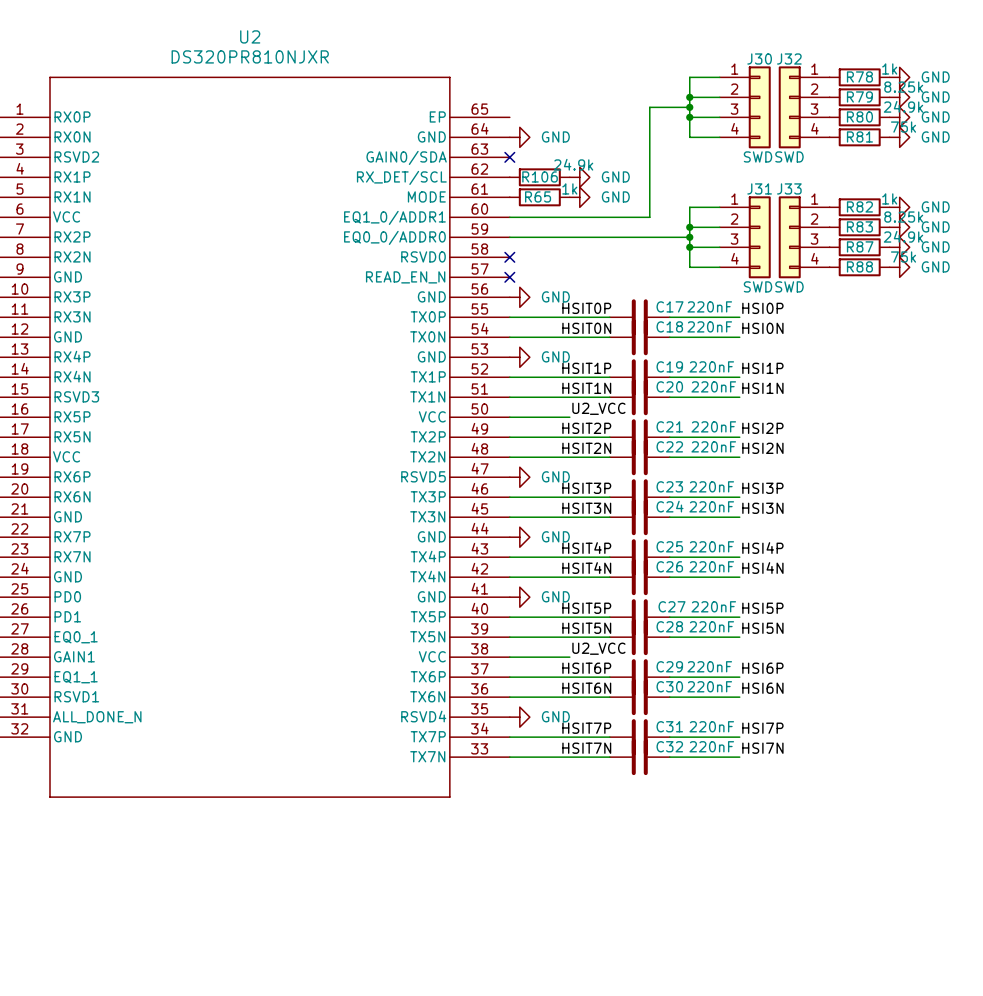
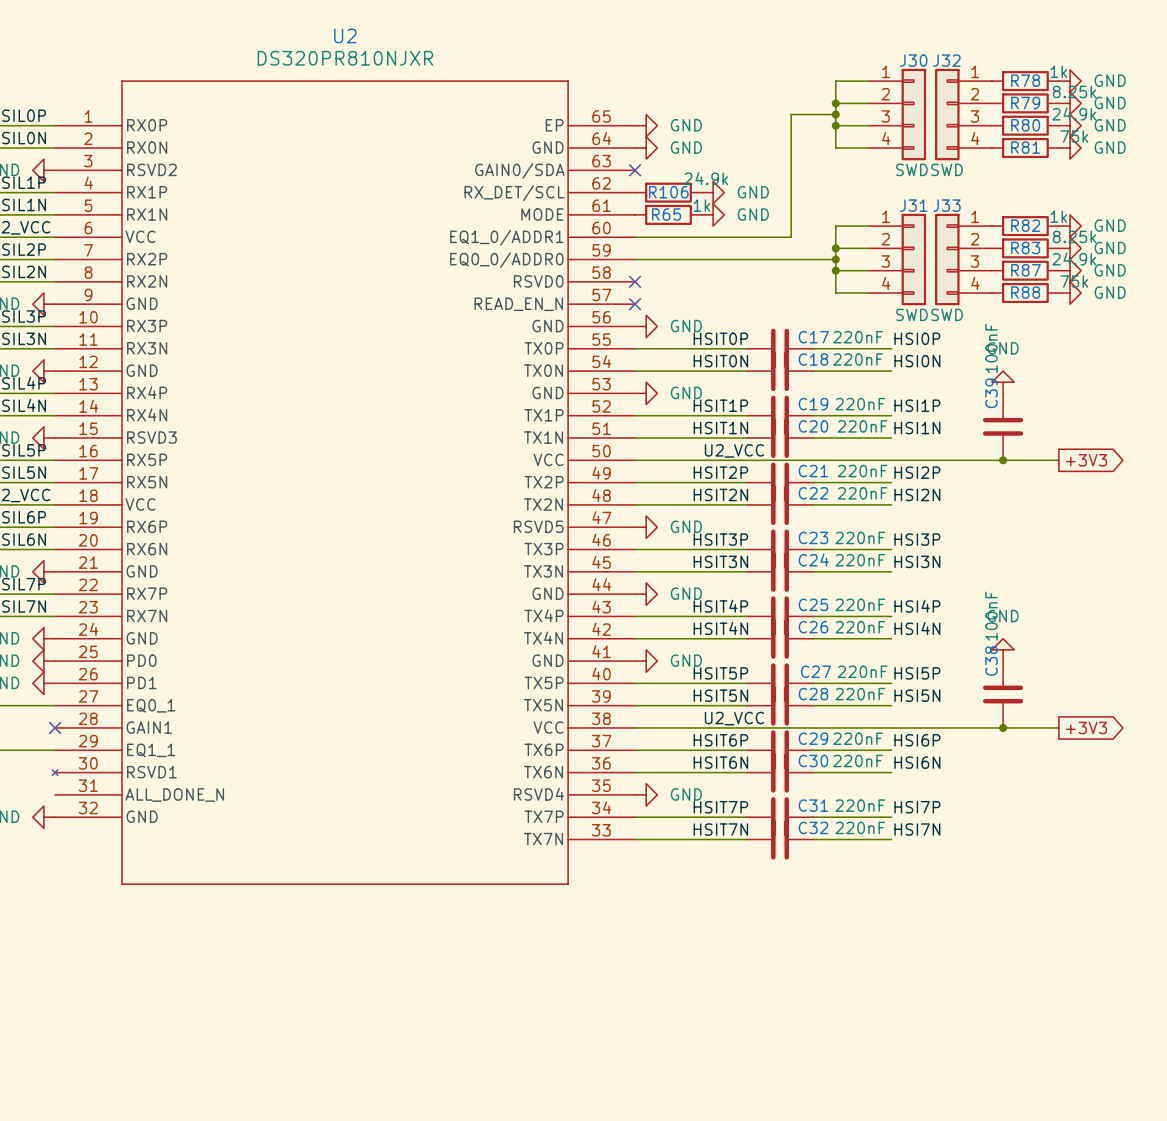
power symbol: none -> GND (646, 125)
power symbol: none -> GND (1003, 382)
C39: none -> 100nF (1003, 426)
wire: none -> (701, 460) (1058, 460)
junction: none -> (1003, 460)
global label: none -> +3V3 (1086, 460)
power symbol: none -> GND (1003, 649)
C38: none -> 100nF (1003, 694)
wire: none -> (701, 727) (1058, 727)
junction: none -> (1003, 727)
global label: none -> +3V3 (1086, 727)

